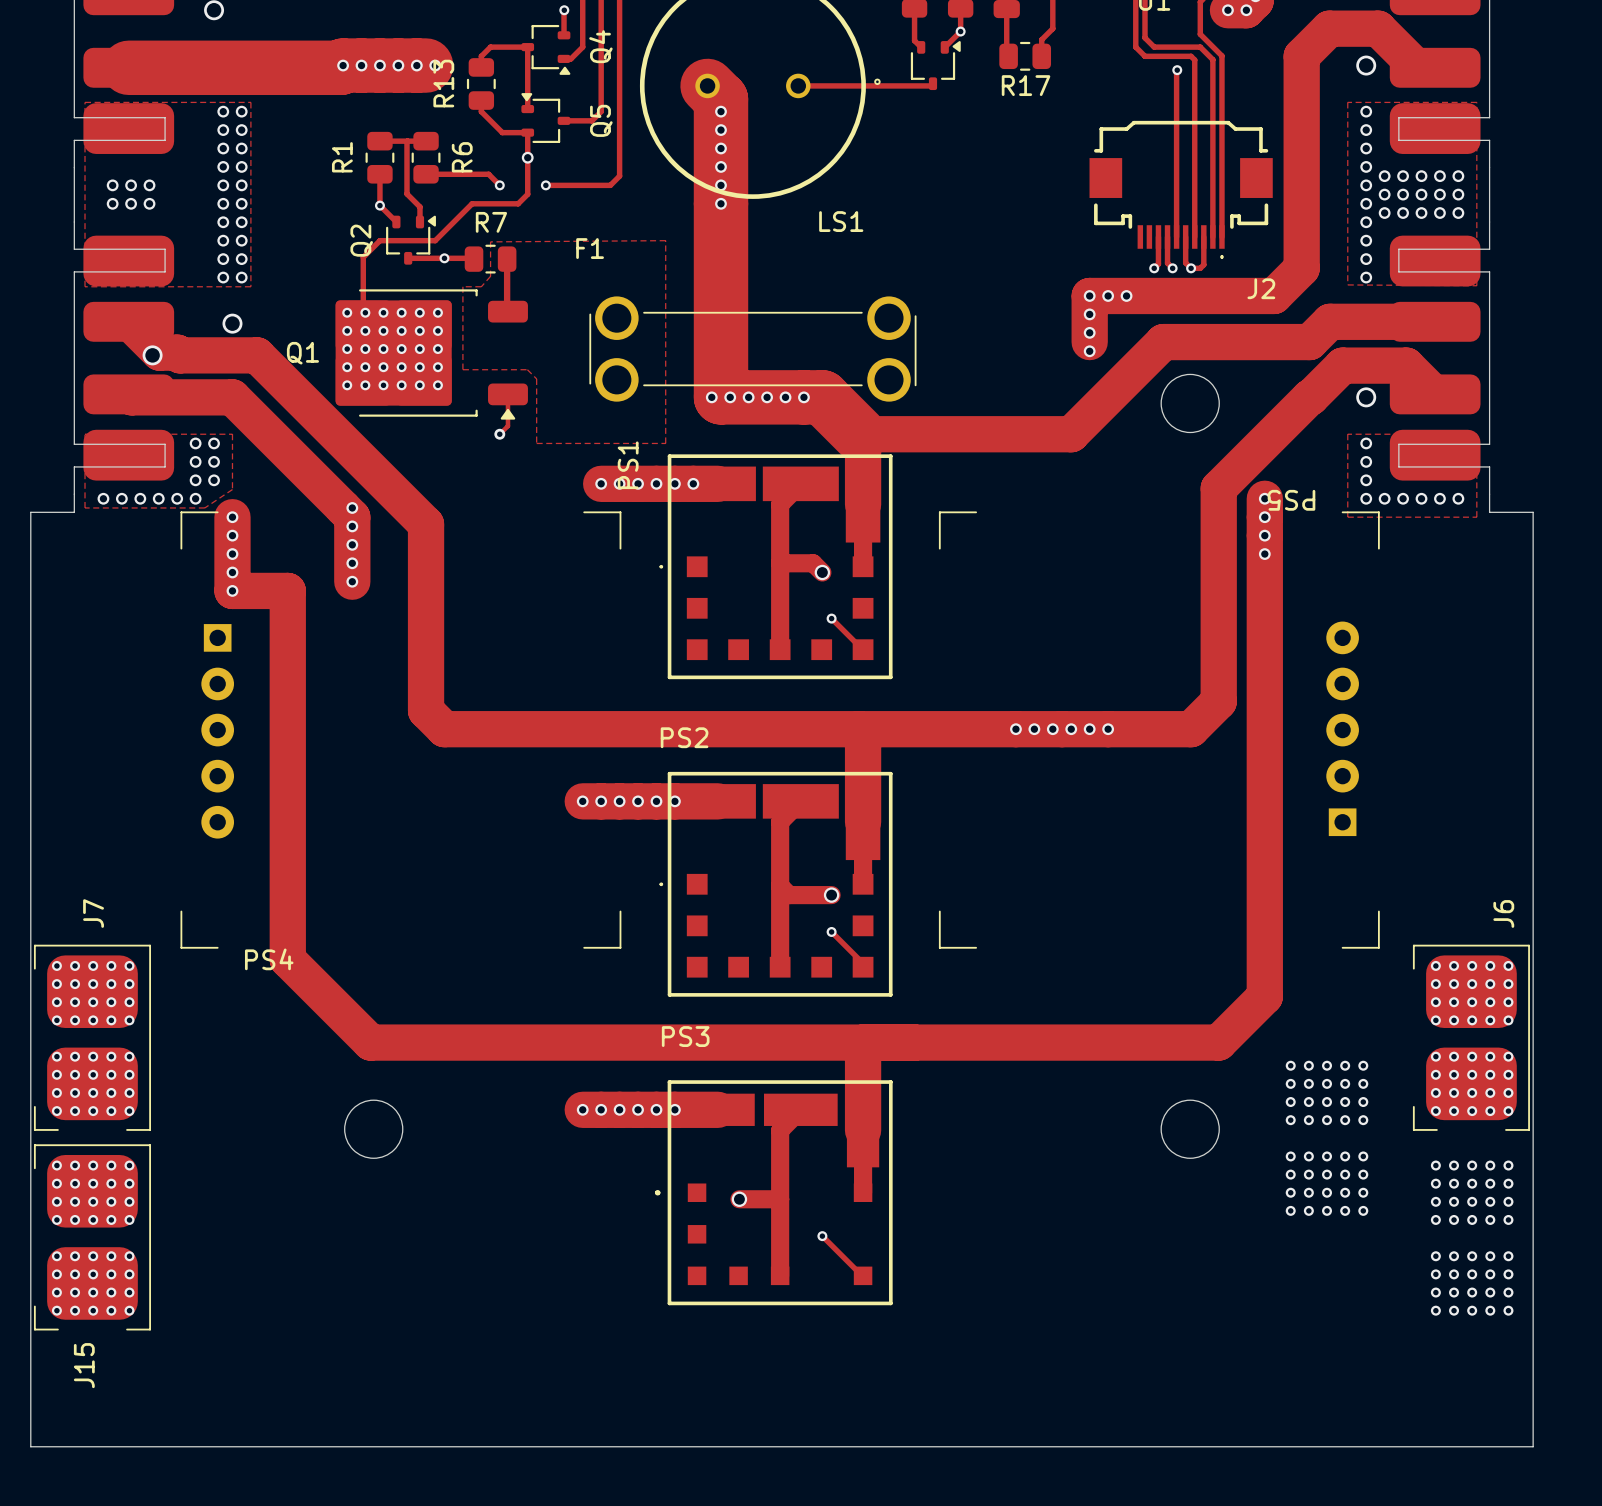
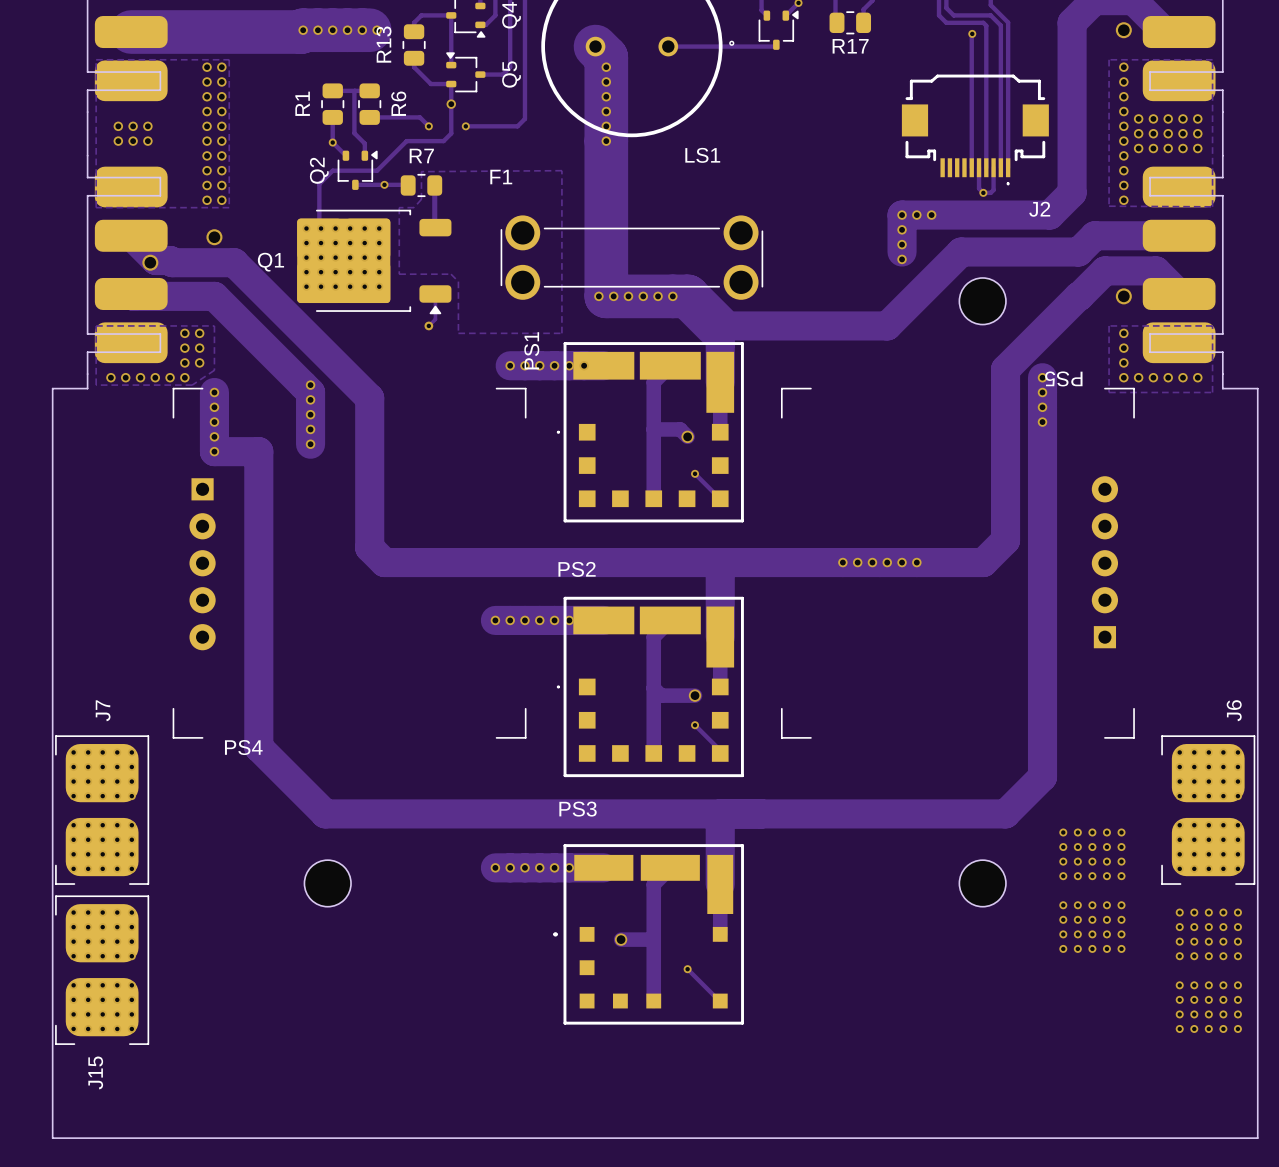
track: (1158, 236) (1158, 264) (1154, 268) -> none
track: (1167, 236) (1167, 263) (1172, 268) -> none
via: (1154, 268) -> none
via: (1172, 268) -> none

